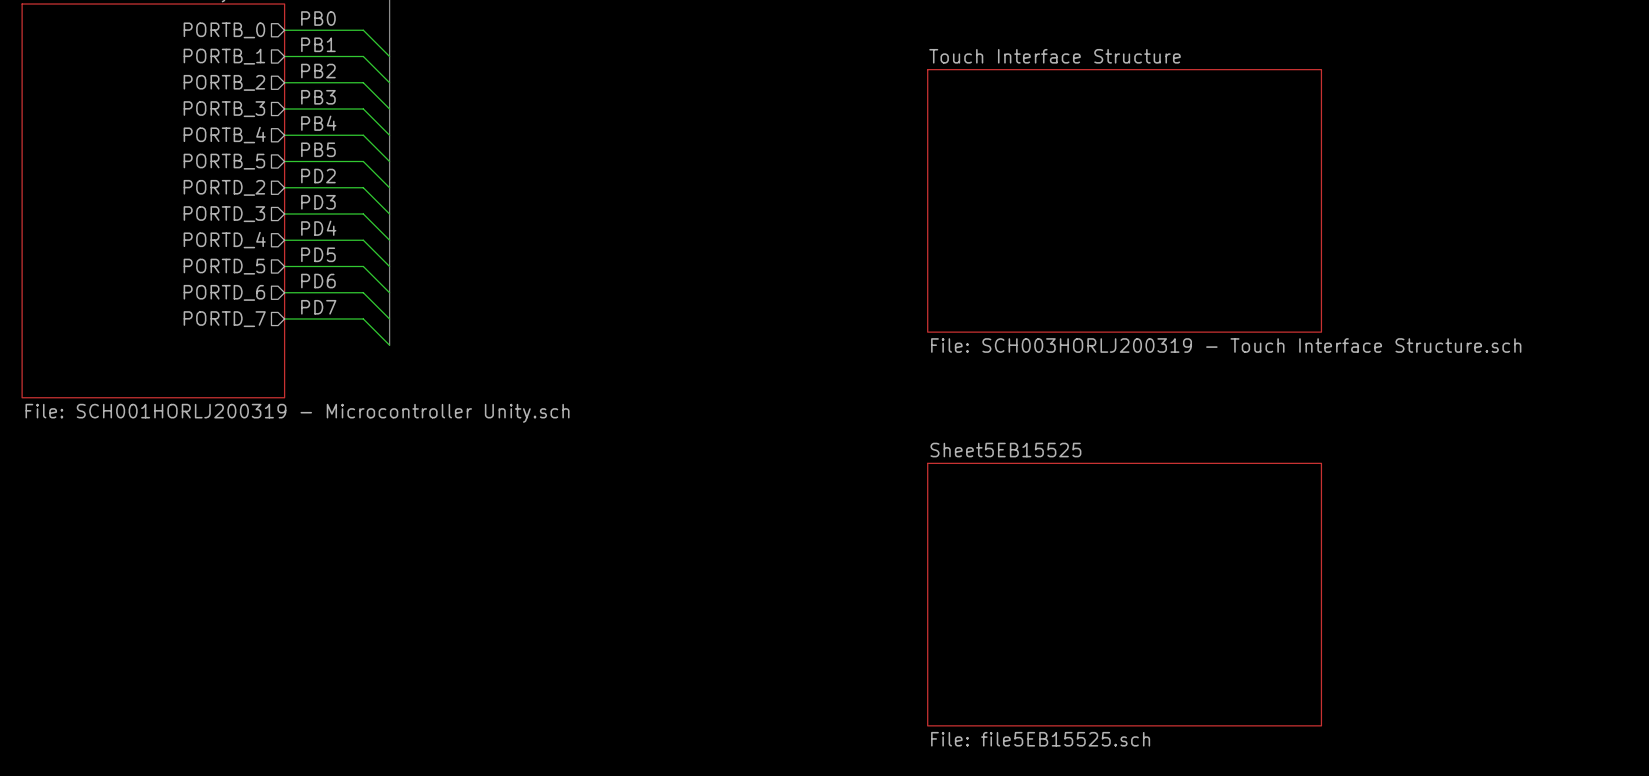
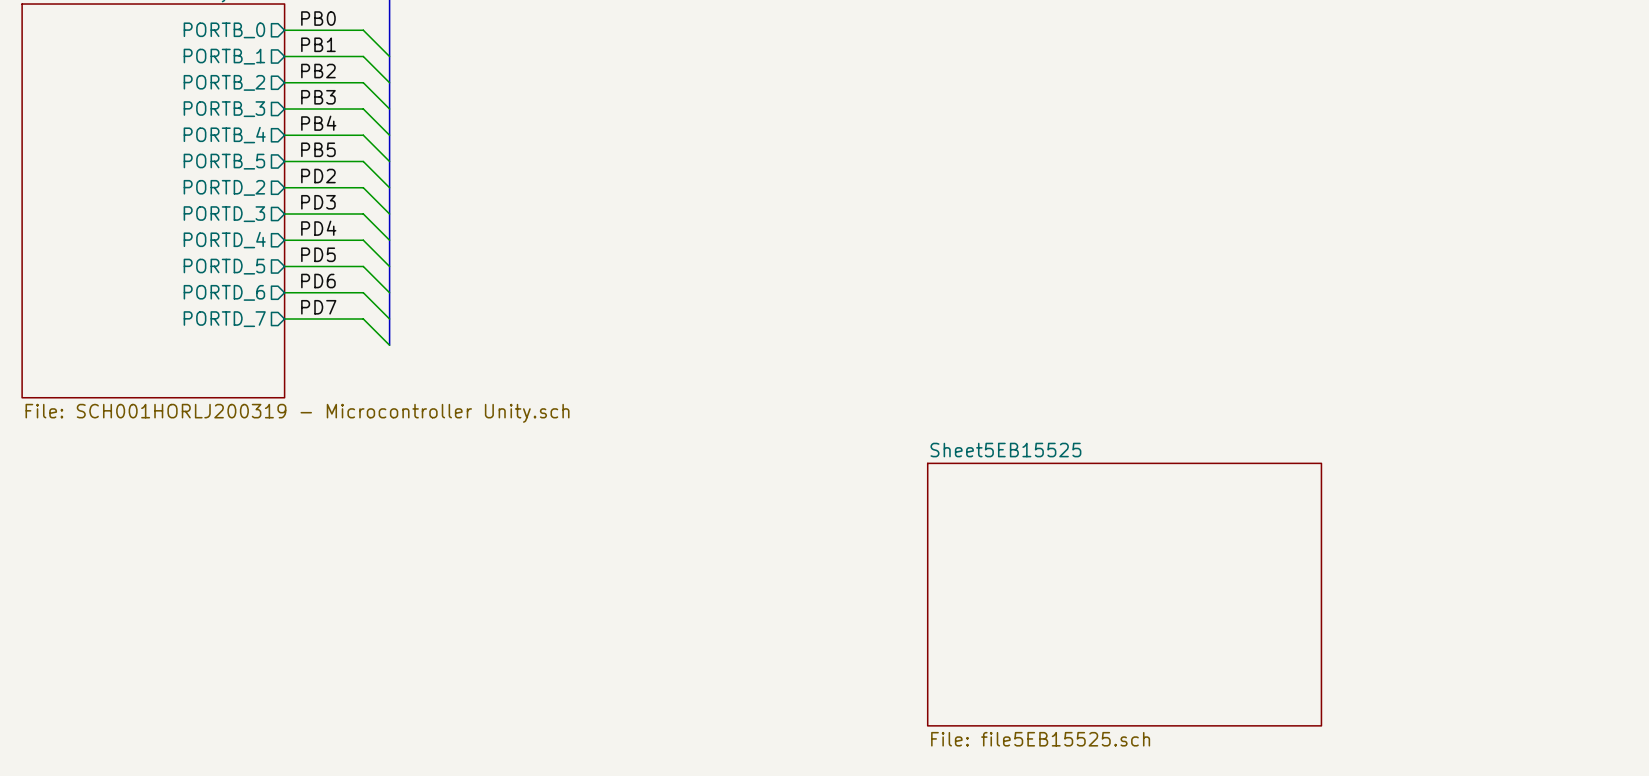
sheet Touch Interface Structure: File: SCH003HORLJ200319 - Touch Interface Structure.sch (1124, 200) -> none

